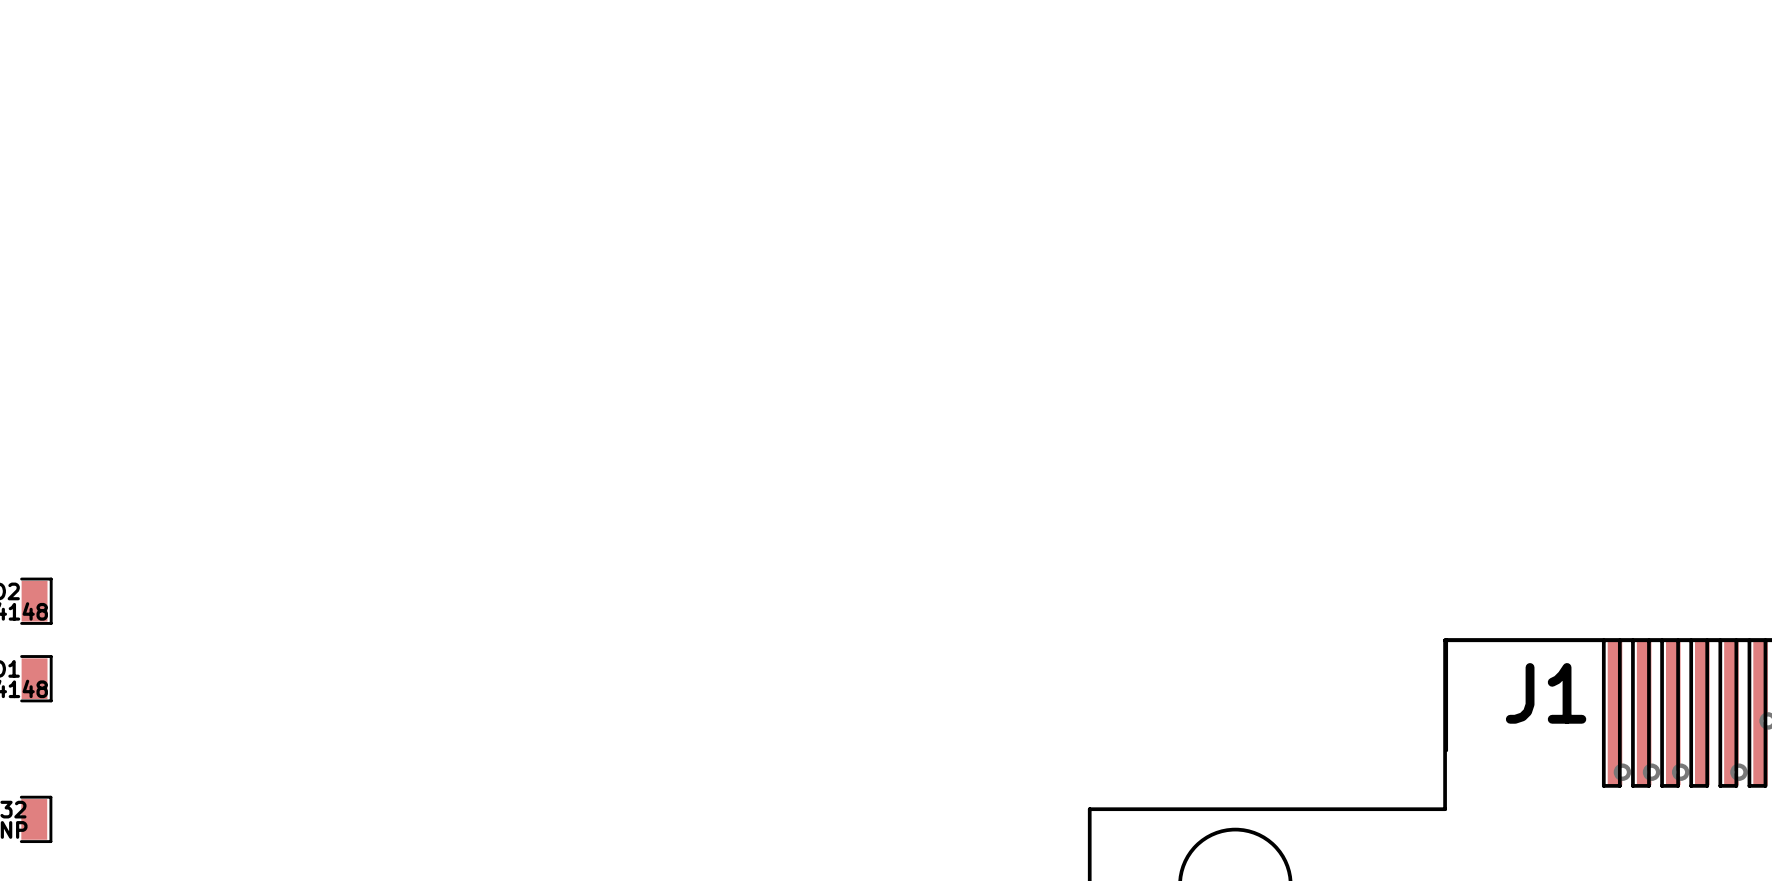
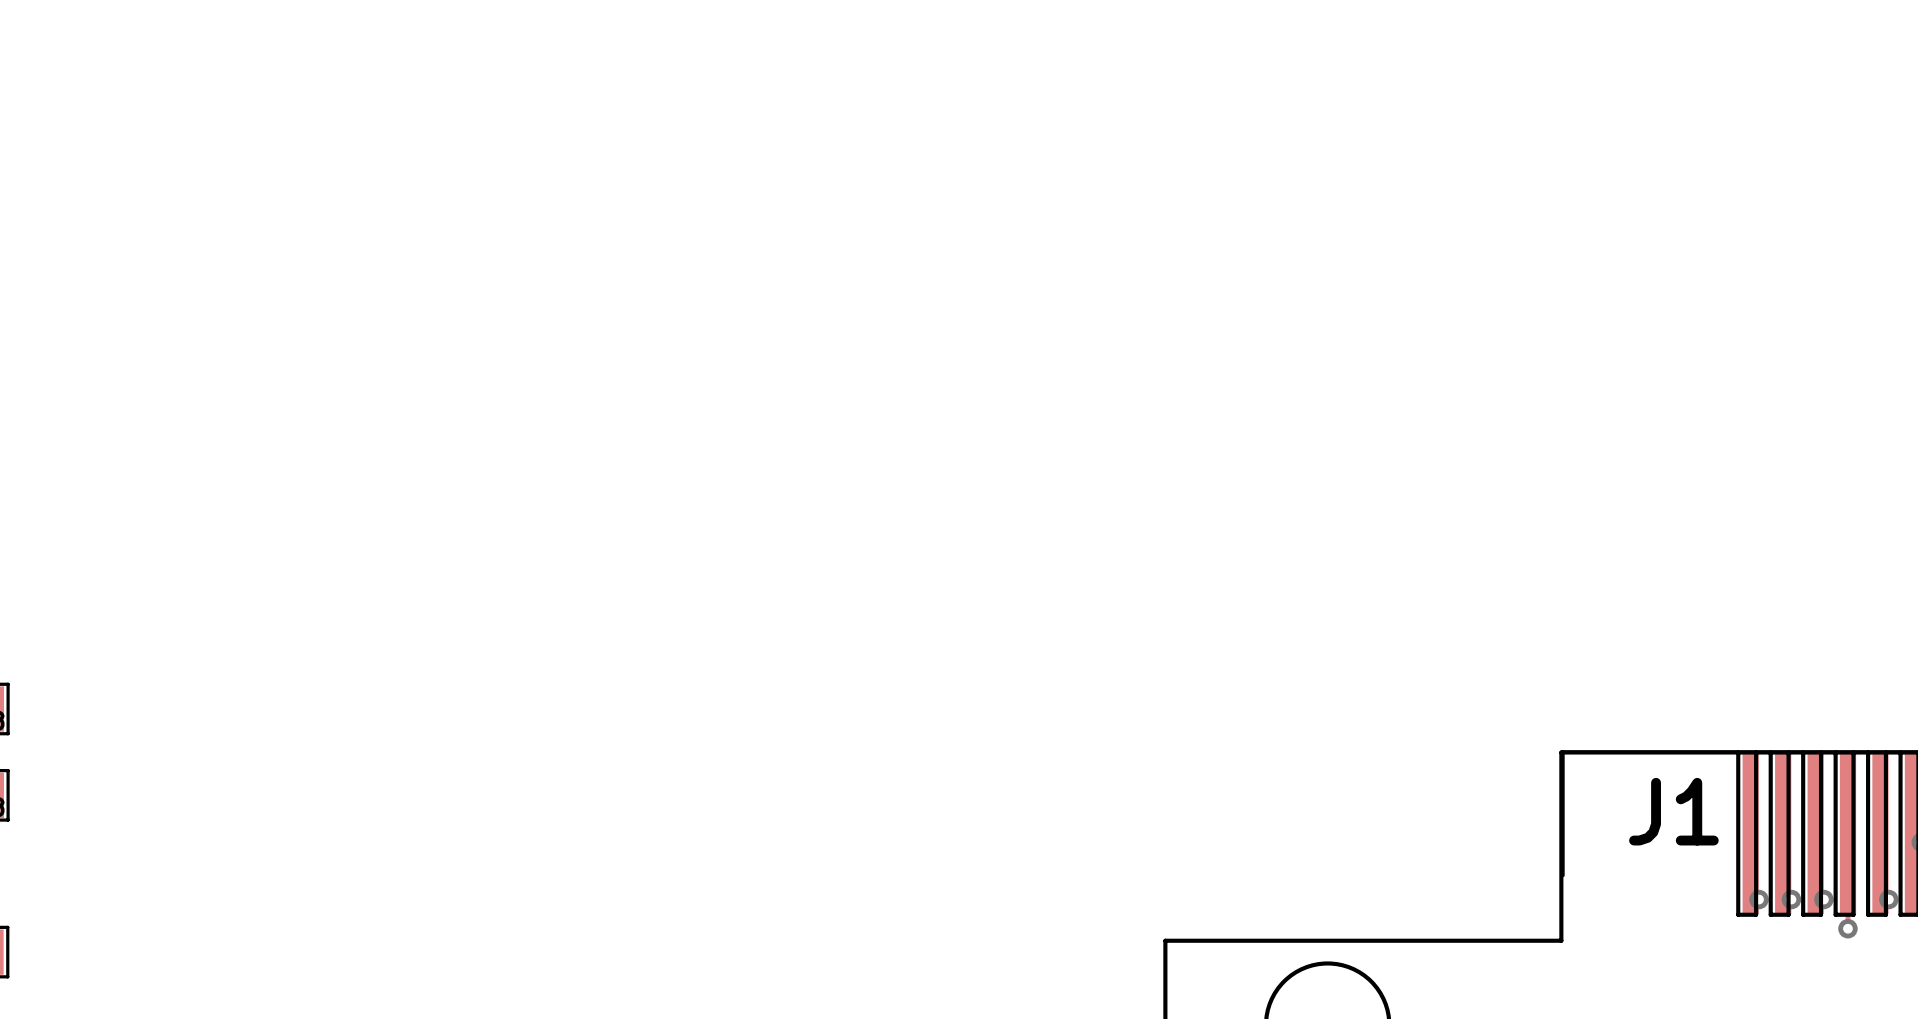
via: none -> (1847, 928)

